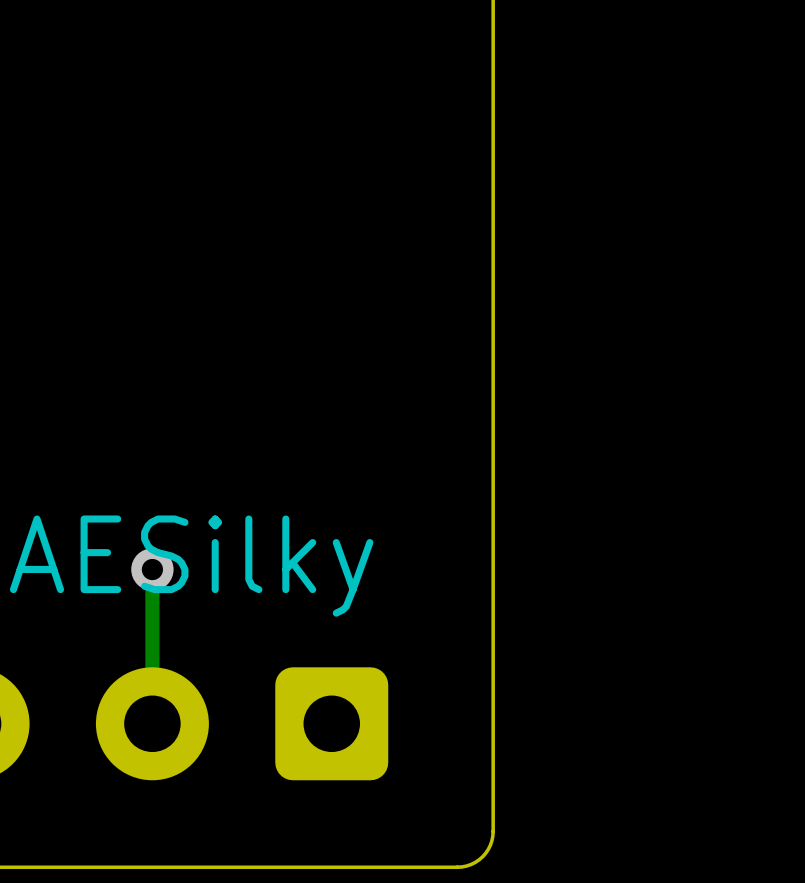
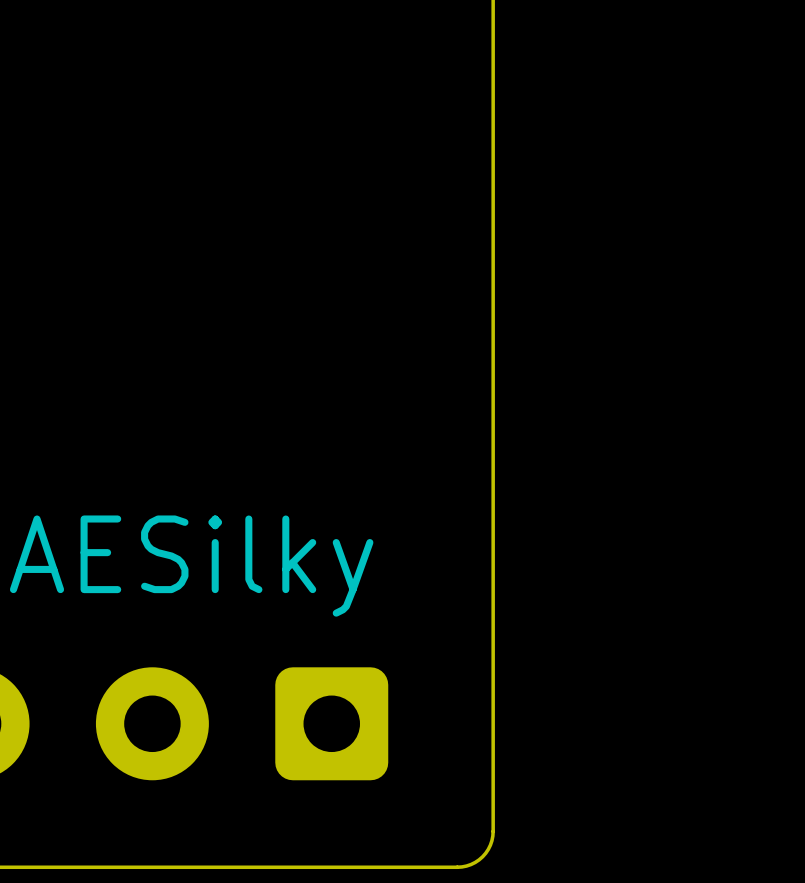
track: (152, 569) (152, 723) -> none
via: (152, 569) -> none

